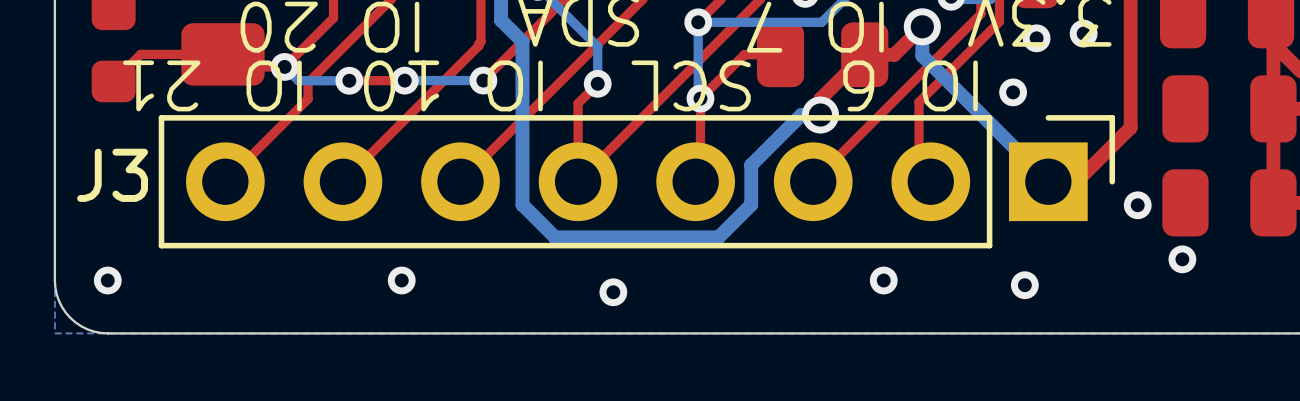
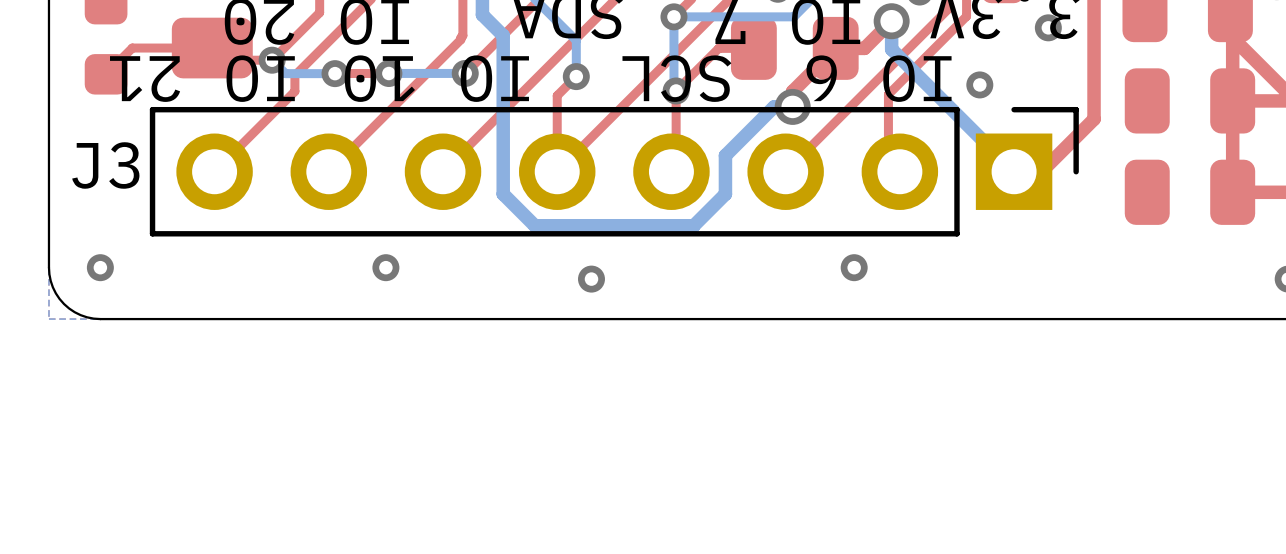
via: (1036, 38) -> none
via: (1137, 205) -> none
via: (1182, 259) -> none
via: (1024, 285) -> none

